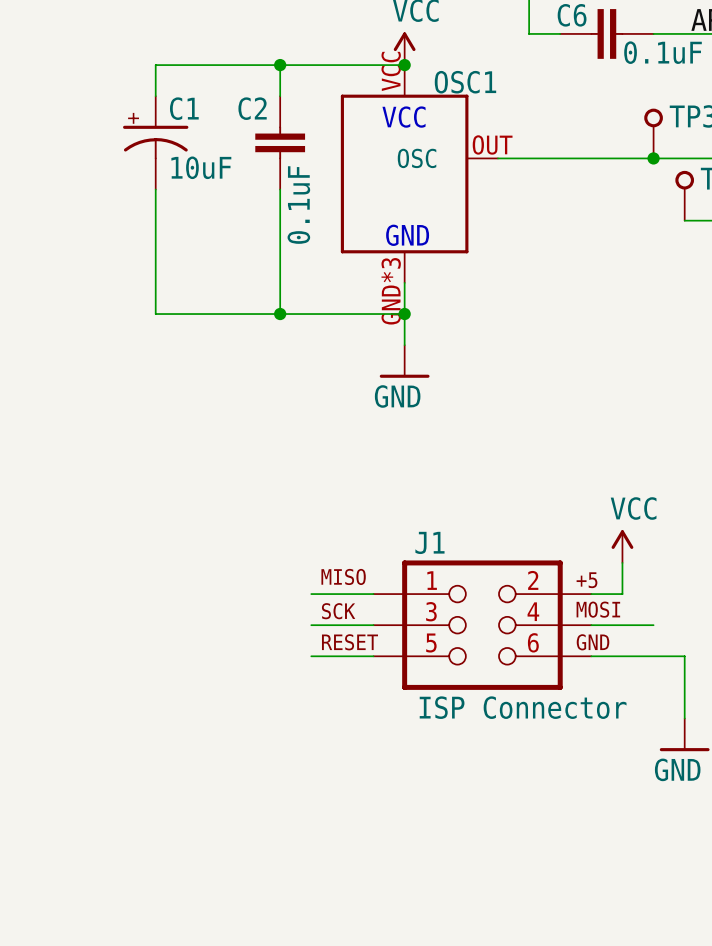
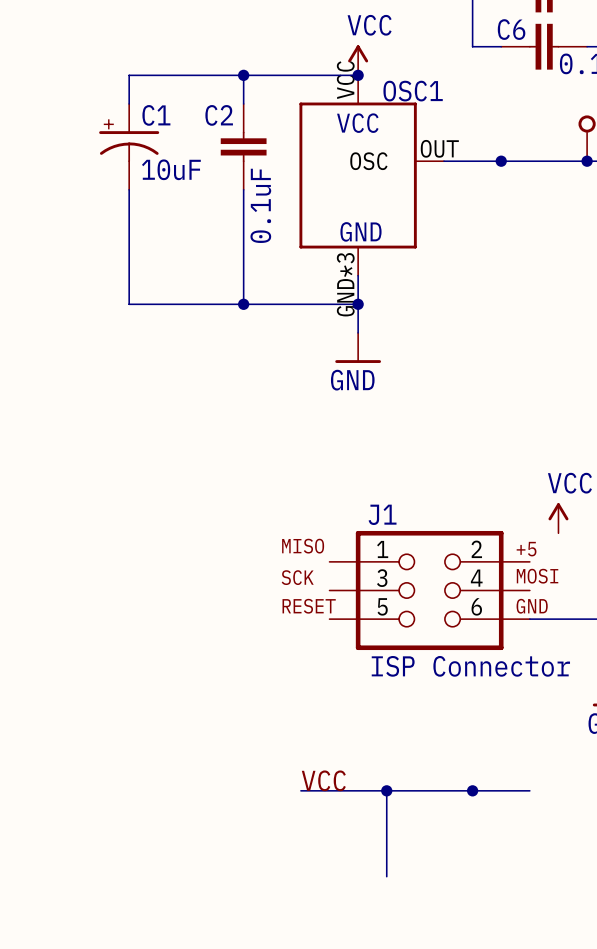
junction: none -> (501, 161)
wire: (622, 562) (622, 594) (591, 594) -> none
wire: (311, 594) (373, 594) -> none
wire: (311, 625) (373, 625) -> none
wire: (591, 625) (653, 625) -> none
wire: (311, 656) (373, 656) -> none
label: none -> VCC (323, 780)
wire: none -> (300, 790) (529, 790)
wire: none -> (386, 790) (386, 876)
junction: none -> (386, 790)
junction: none -> (472, 790)

